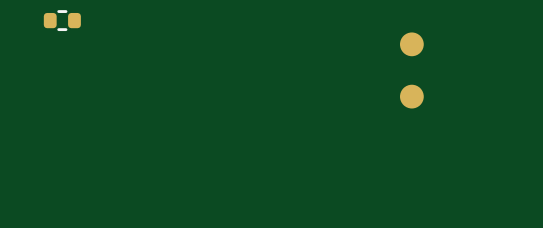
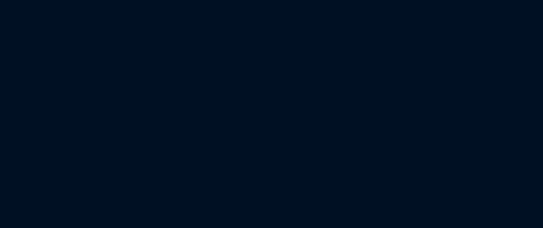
part: (62, 20) -> none
part: (411, 44) -> none
part: (411, 96) -> none

